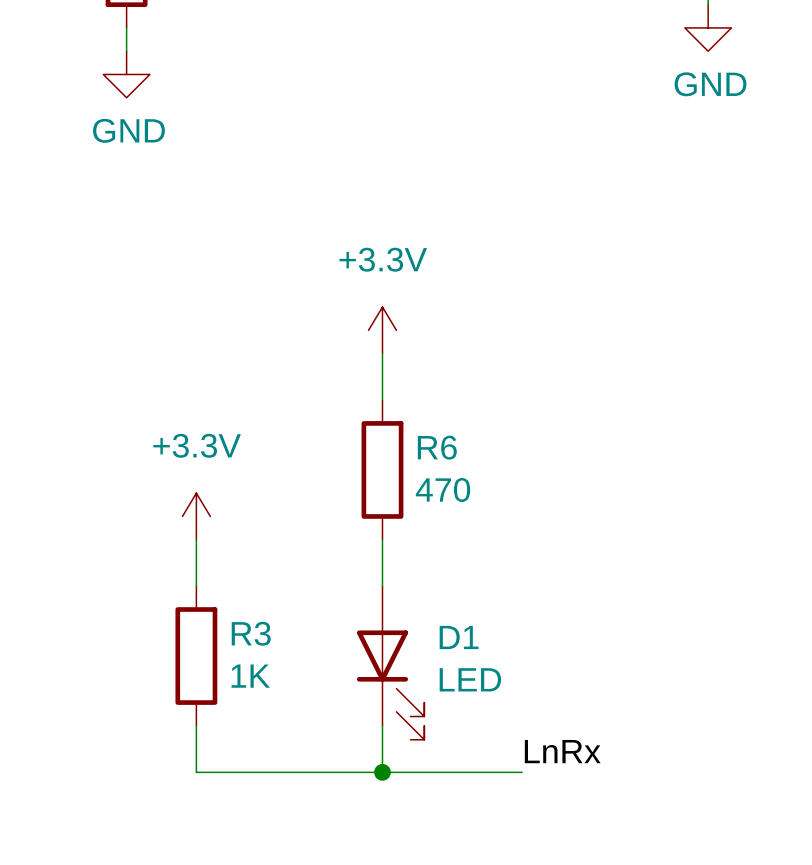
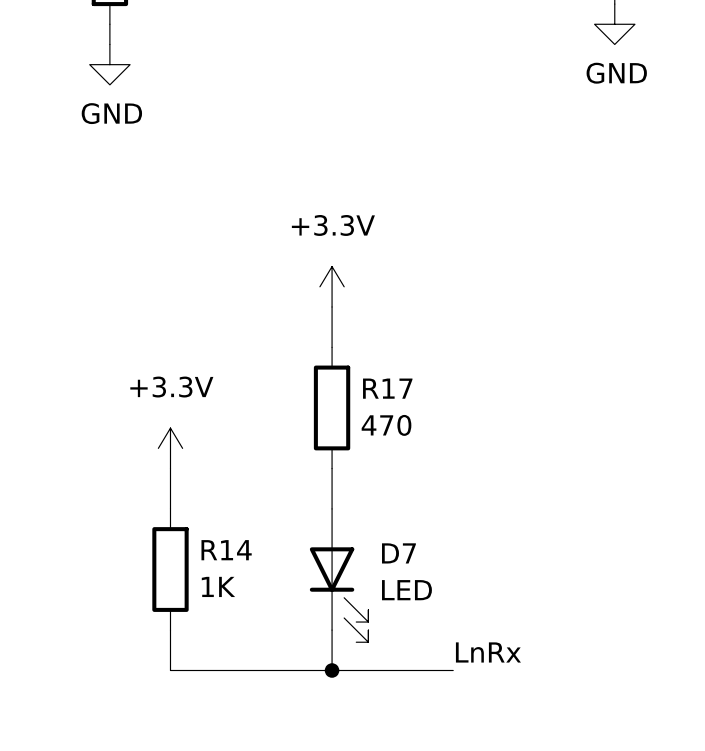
R6 name: R6 (437, 447) -> R17 (387, 388)
R3 name: R3 (251, 633) -> R14 (226, 550)
D1 name: D1 (459, 637) -> D7 (398, 553)

